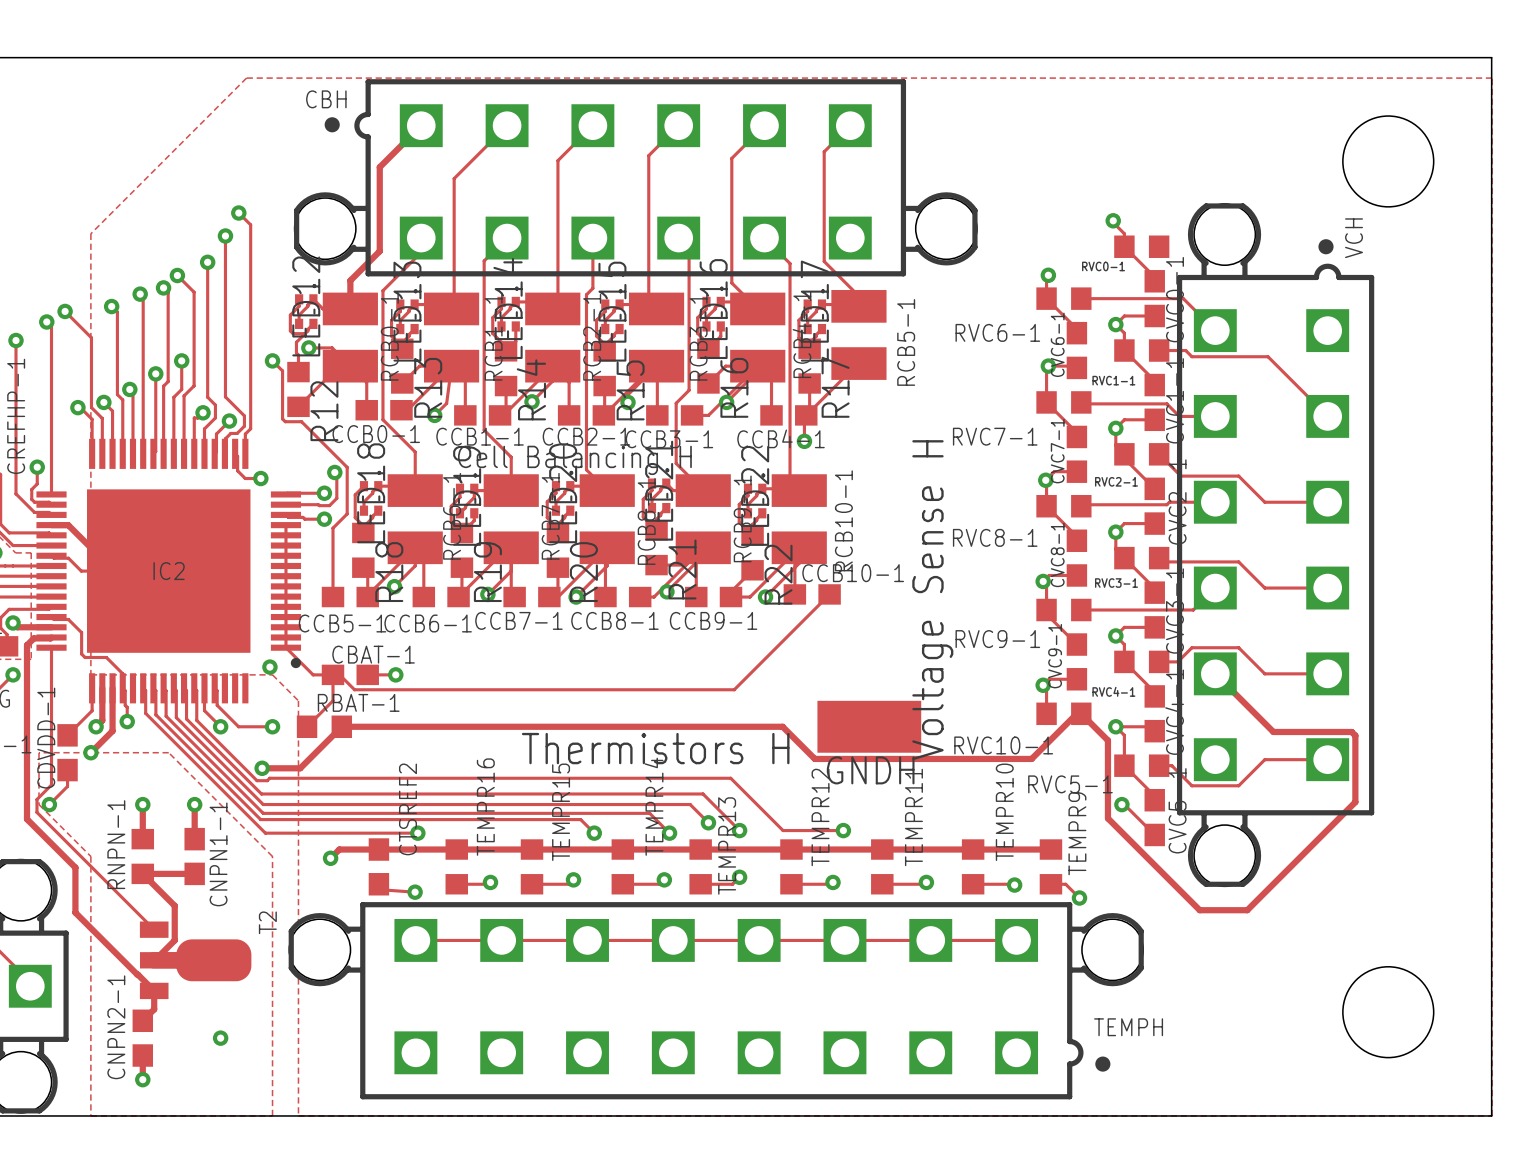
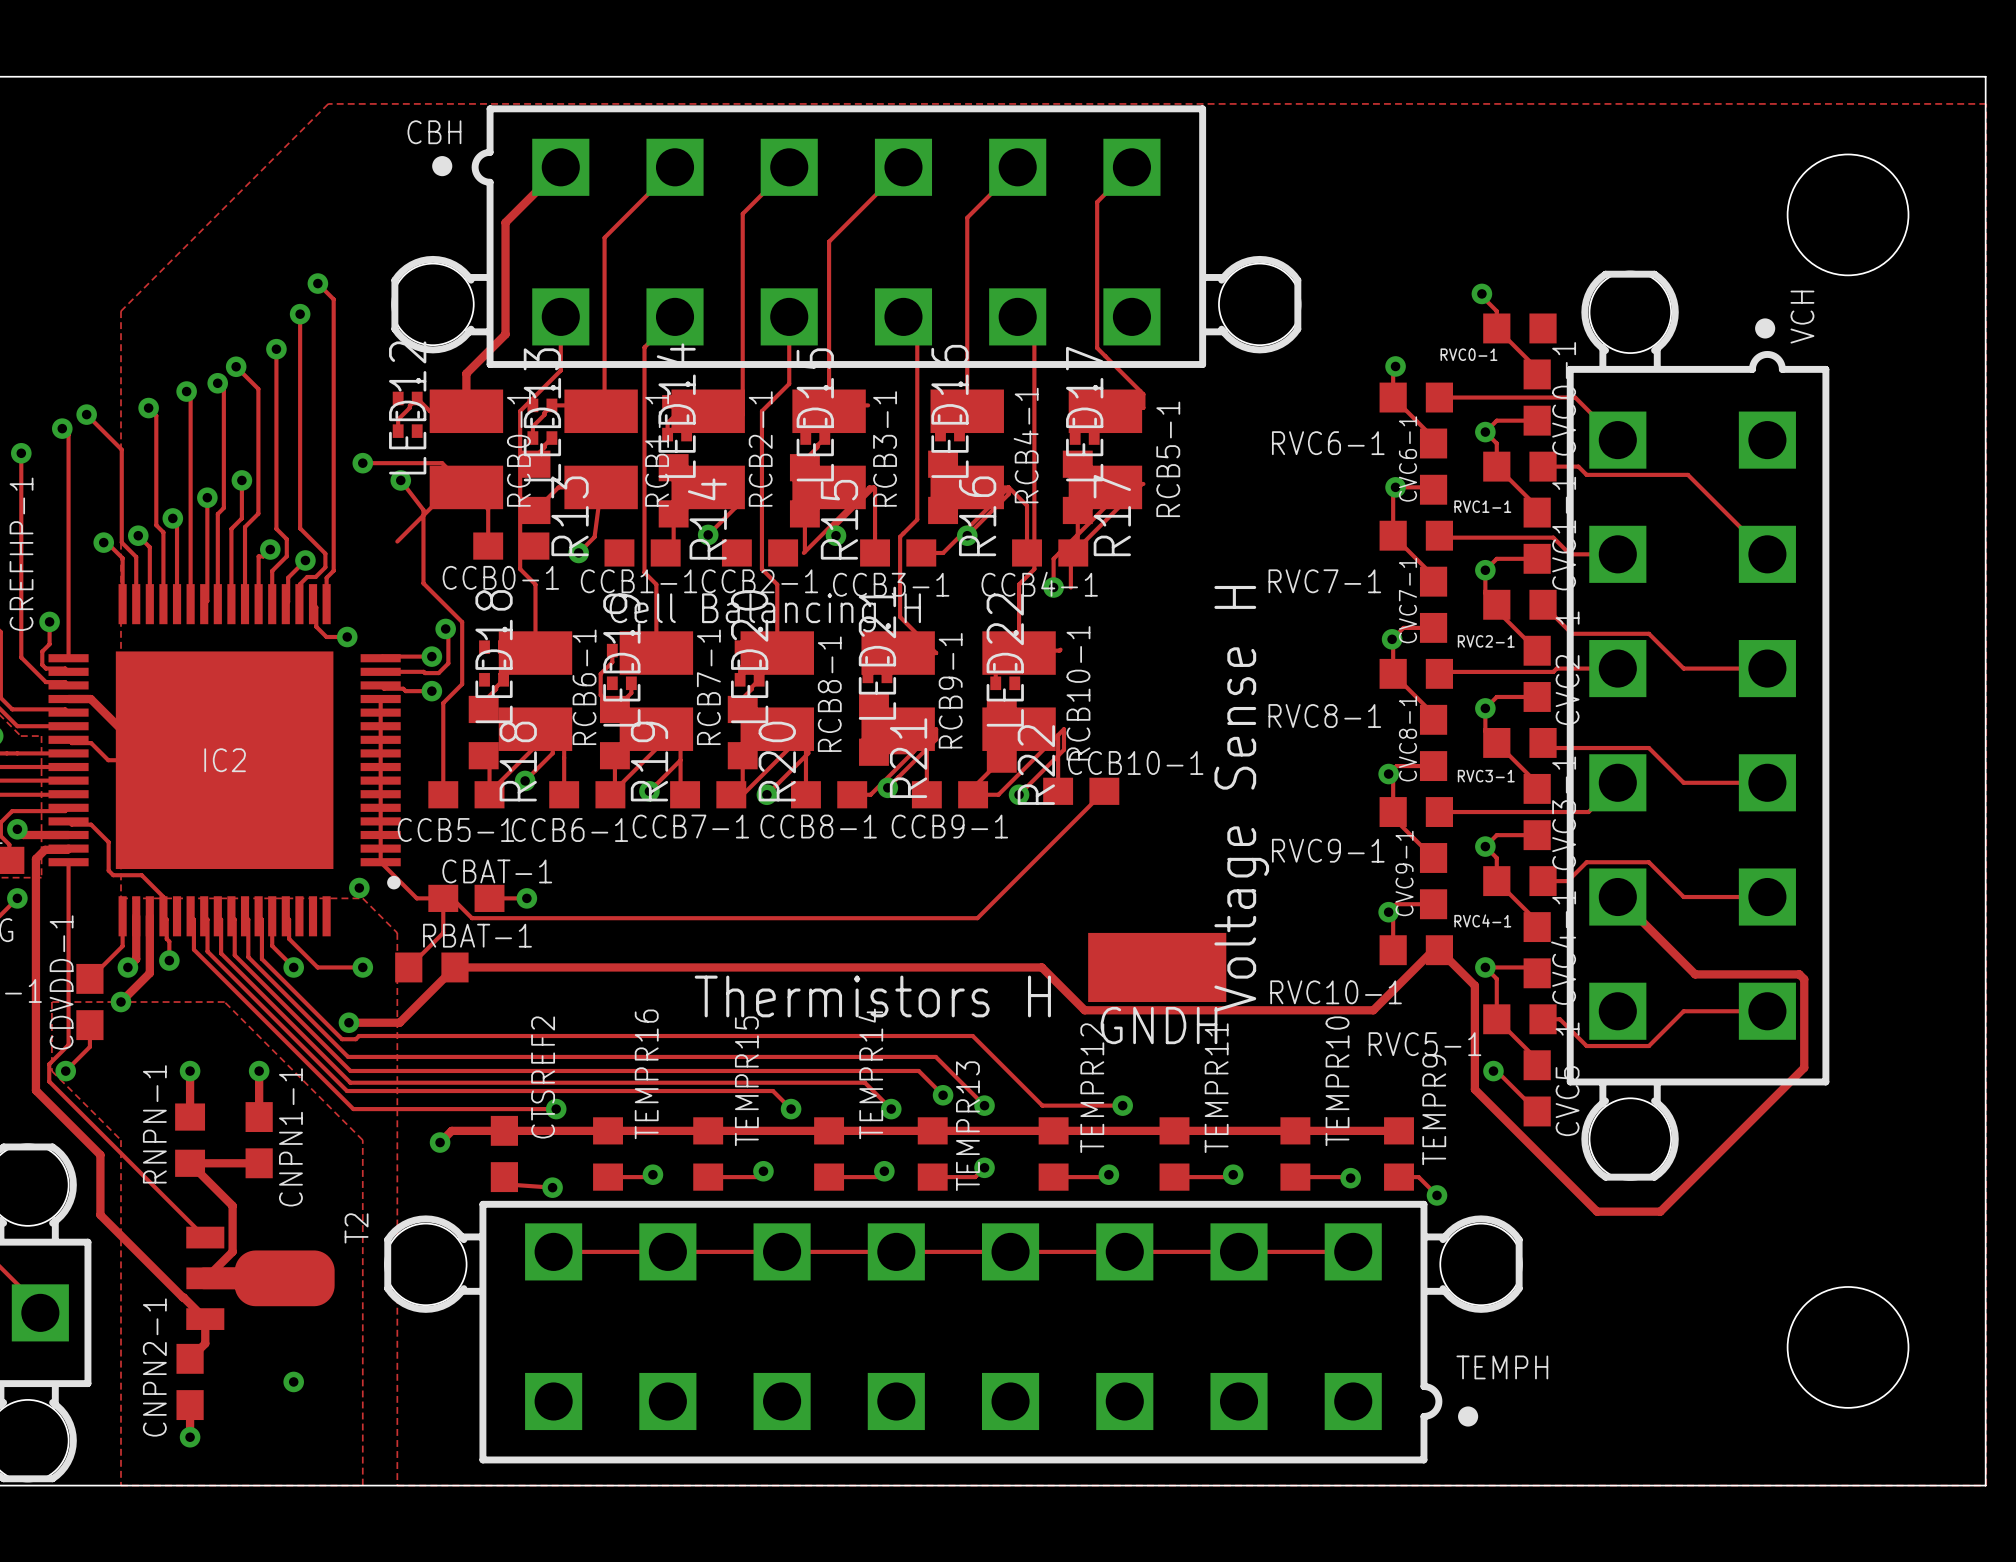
track: (648, 155) (648, 301) (656, 308) -> (863, 207) (829, 241) (829, 411)
track: (731, 158) (731, 283) (757, 308) -> (974, 210) (967, 217) (967, 411)
track: (777, 250) (790, 263) (790, 481) (799, 490) -> (1034, 333) (1034, 569) (1019, 584) (1019, 653)
track: (421, 252) (382, 290) (382, 419) (390, 427) -> (560, 335) (560, 370) (520, 411) (520, 569)
track: (586, 294) (586, 469) (607, 490) -> (780, 392) (761, 411) (761, 569) (777, 584) (777, 653)
track: (299, 299) (299, 306) (290, 315) (290, 330) (293, 333) (305, 333) -> none
track: (501, 301) (501, 308) (492, 317) (492, 333) (506, 346) (506, 351) (515, 341) (515, 326) -> none
track: (706, 301) (706, 308) (697, 317) (697, 333) (708, 344) (708, 348) (720, 336) (720, 326) -> none
track: (400, 304) (400, 311) (391, 320) (391, 336) (402, 346) -> none
track: (605, 304) (605, 311) (596, 320) (596, 336) (604, 344) (604, 351) -> none
track: (807, 304) (807, 311) (798, 320) (798, 338) (809, 348) (809, 342) (821, 329) -> none
track: (313, 323) (296, 342) (298, 372) -> none
RCB5-1 position: (858, 334) -> (1105, 449)
RCB2-1 position: (552, 337) -> (708, 449)
RCB3-1 position: (656, 337) -> (829, 449)
RCB4-1 position: (757, 337) -> (967, 449)
track: none -> (362, 463) (411, 463)
via position: (308, 347) -> (400, 480)
track: (272, 360) (282, 370) (282, 418) (285, 421) (301, 421) (318, 438) -> (400, 480) (423, 510) (423, 583)
via position: (272, 360) -> (362, 463)
track: none -> (1105, 487) (1105, 507) (1053, 558) (1053, 587)
R12: (298, 389) -> none
track: (401, 410) (407, 410) (451, 366) (465, 379) (465, 415) -> none
track: (500, 415) (503, 415) (552, 366) (569, 382) (569, 415) -> none
CCB2-1 position: (586, 415) -> (760, 552)
track: (402, 439) (415, 452) (415, 490) (410, 486) (378, 486) (363, 501) (363, 510) -> (535, 584) (535, 653)
track: (493, 439) (511, 457) (511, 490) (476, 490) (474, 488) (474, 497) (459, 513) -> (656, 584) (656, 653)
via position: (804, 441) -> (1053, 587)
track: (651, 483) (651, 490) (643, 499) (643, 517) (656, 530) (656, 519) (666, 508) -> none
track: (363, 486) (355, 494) (355, 517) (363, 525) (363, 532) -> none
track: (555, 486) (555, 493) (547, 501) (547, 517) (557, 528) -> none
track: (748, 488) (748, 495) (739, 504) (739, 522) (752, 535) (752, 524) (762, 513) -> none
RCB6-1 position: (415, 519) -> (535, 691)
RCB7-1 position: (511, 519) -> (656, 691)
RCB8-1 position: (607, 519) -> (777, 691)
RCB9-1 position: (703, 519) -> (898, 691)
RCB10-1 position: (799, 519) -> (1019, 691)

